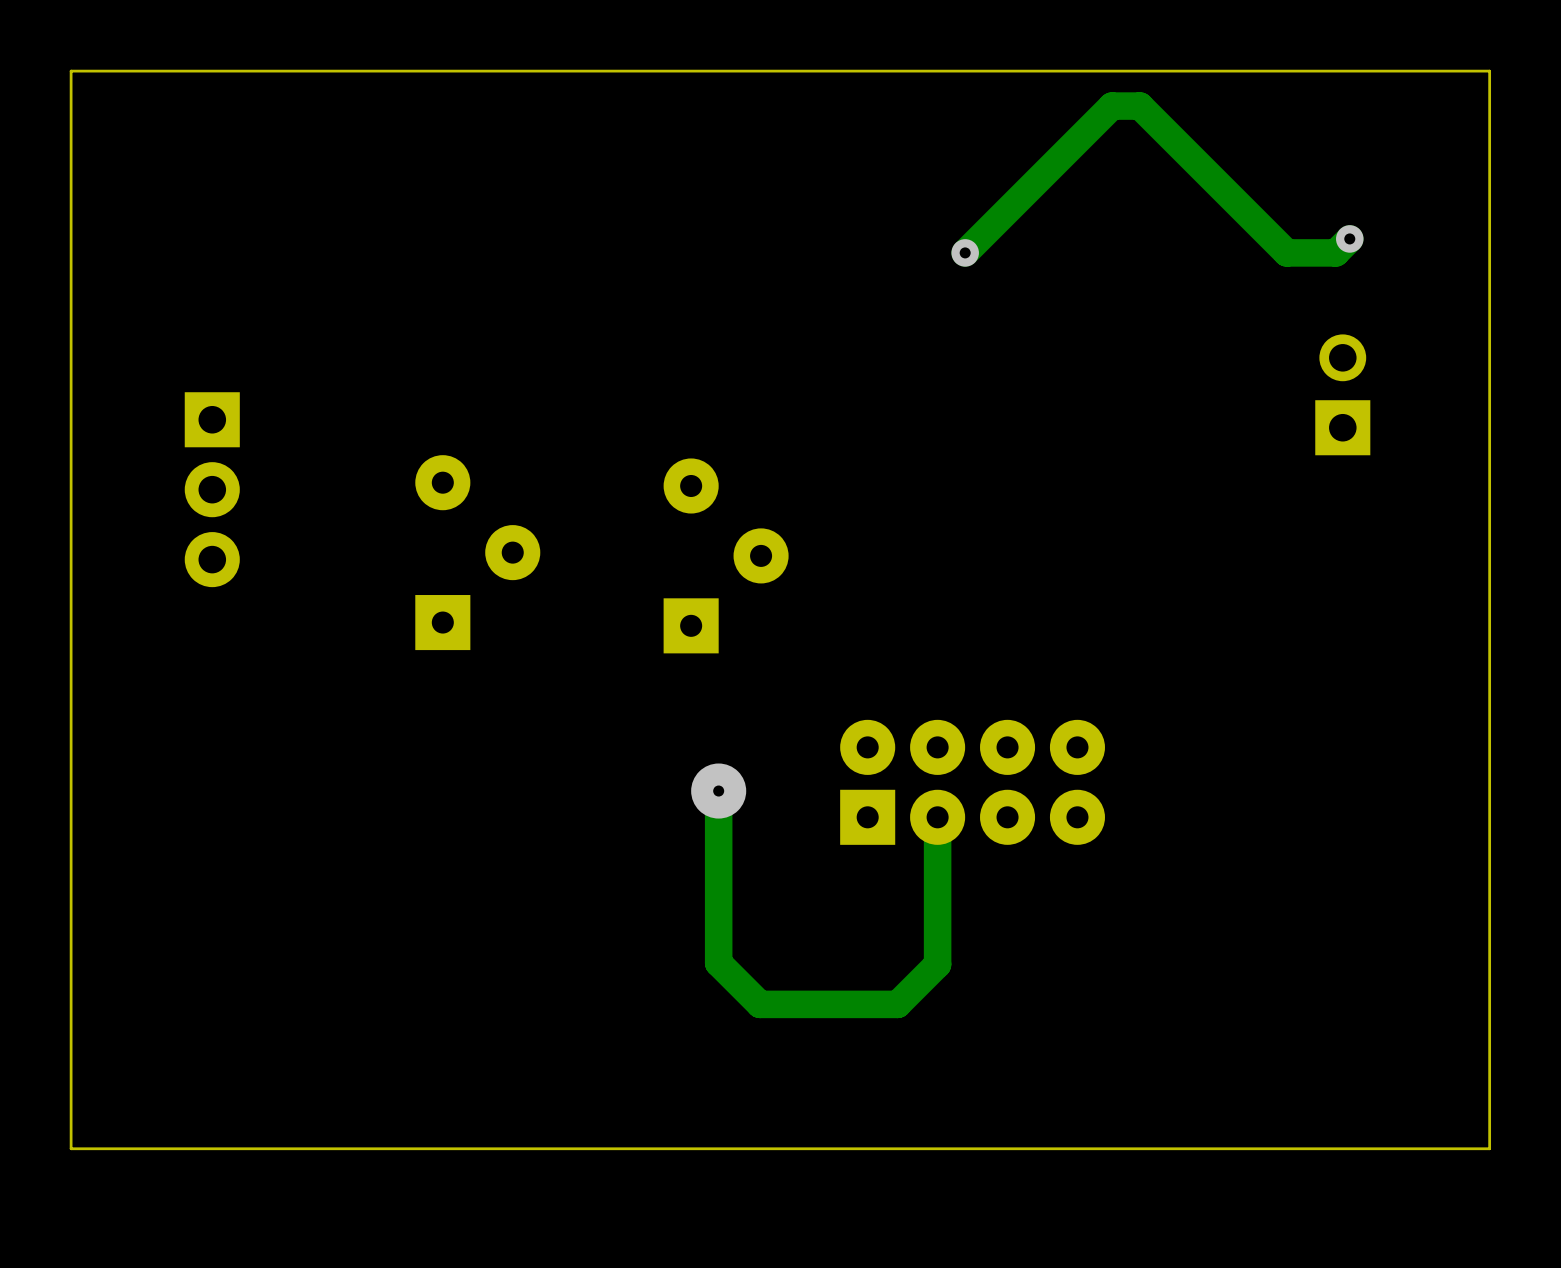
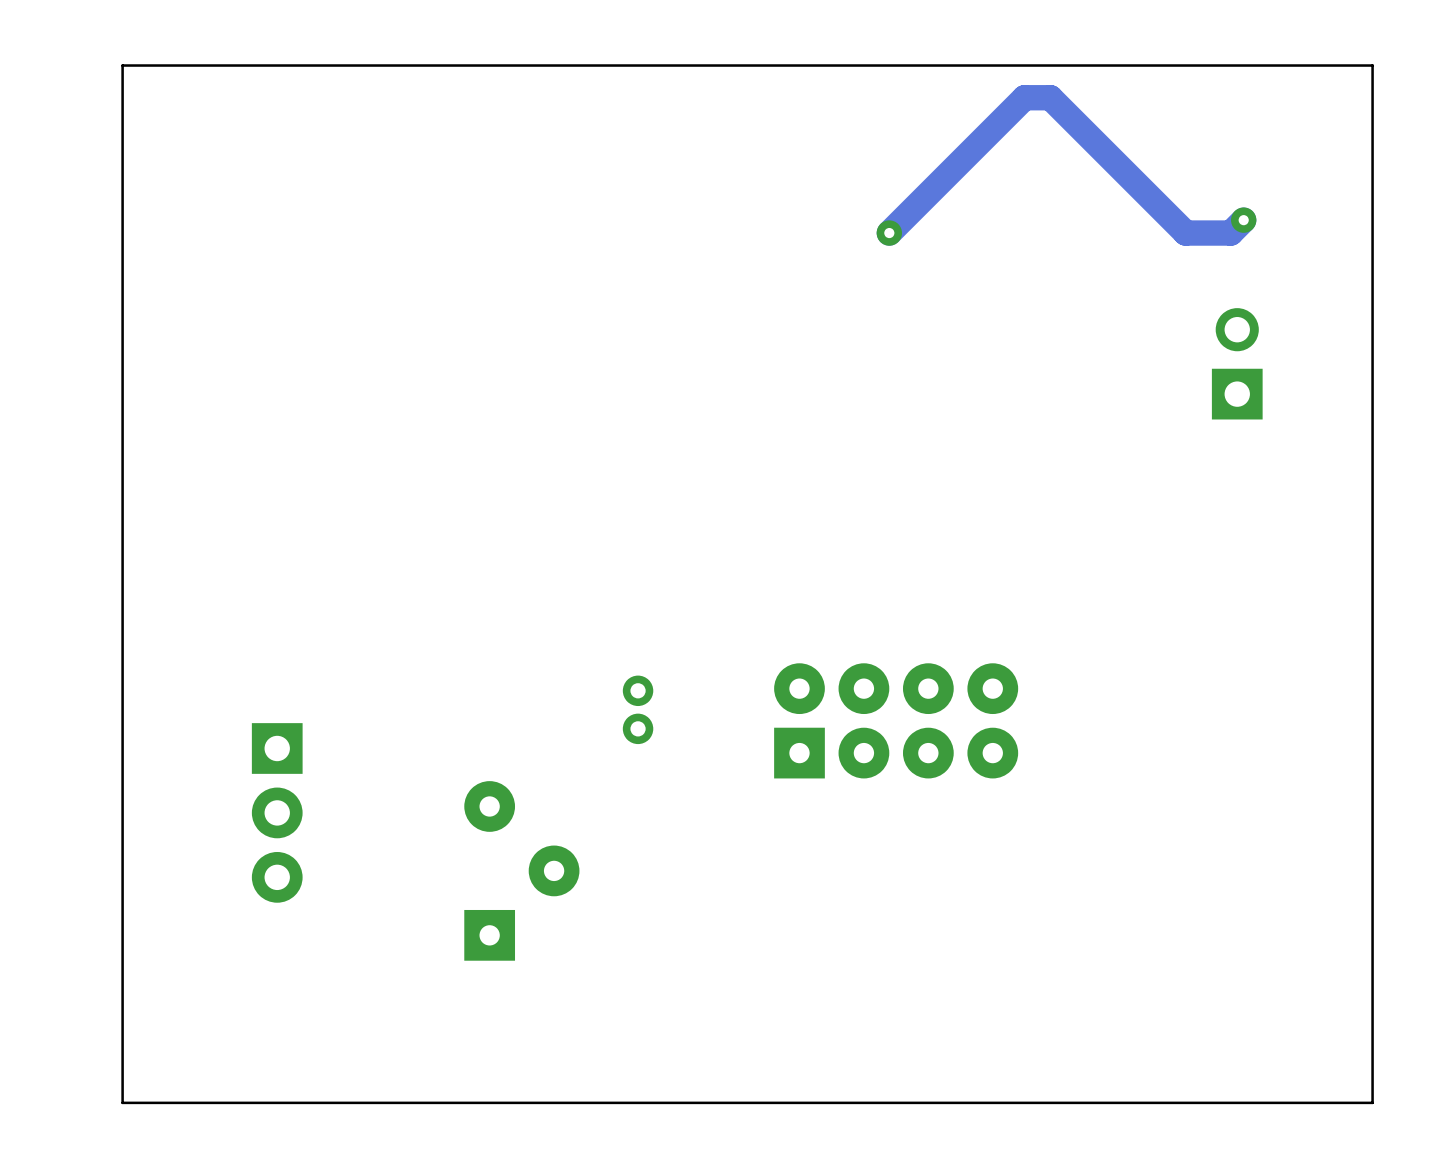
board edge: (133, 71) (71, 71) (71, 1148) (1489, 1148) -> (122, 65) (122, 1102) (1372, 1102) (1372, 1058)
part position: (212, 489) -> (277, 812)
part: (477, 552) -> none
part: (726, 555) -> none
part: none -> (638, 709)
track: (718, 791) (718, 963) (759, 1004) (897, 1004) (937, 964) (937, 817) -> none
via: (718, 791) -> none
part: none -> (521, 870)

